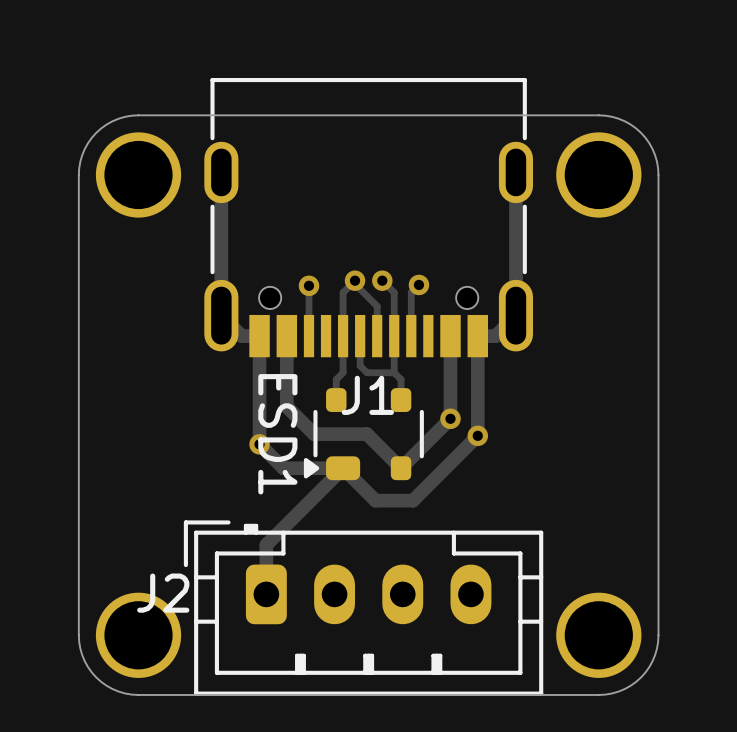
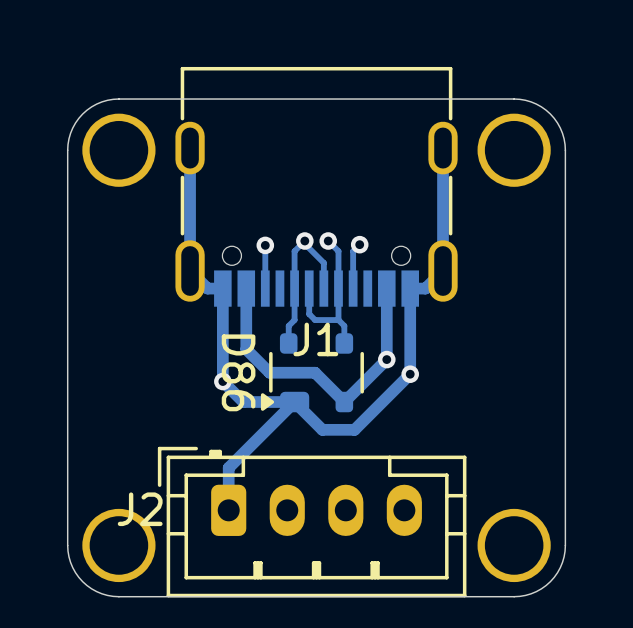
ESD1 name: ESD1 (277, 434) -> D86 (238, 372)

